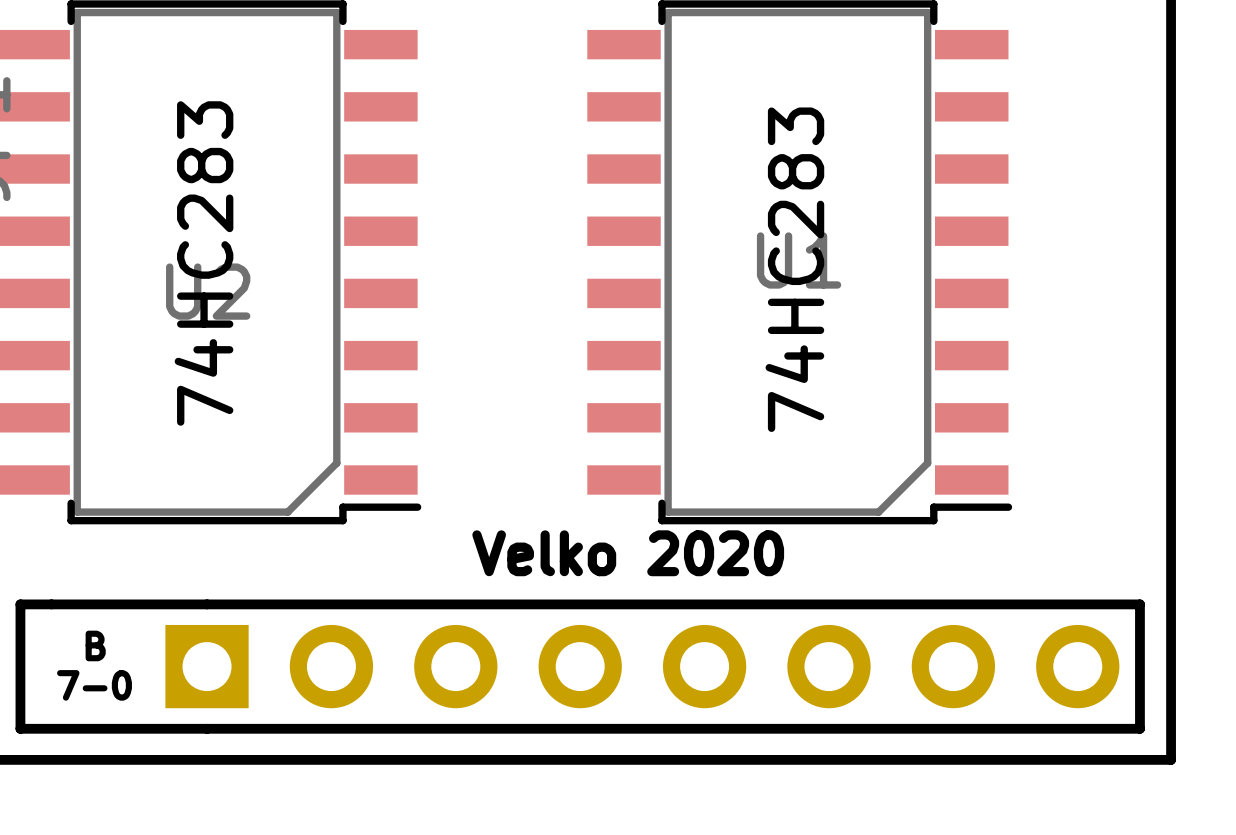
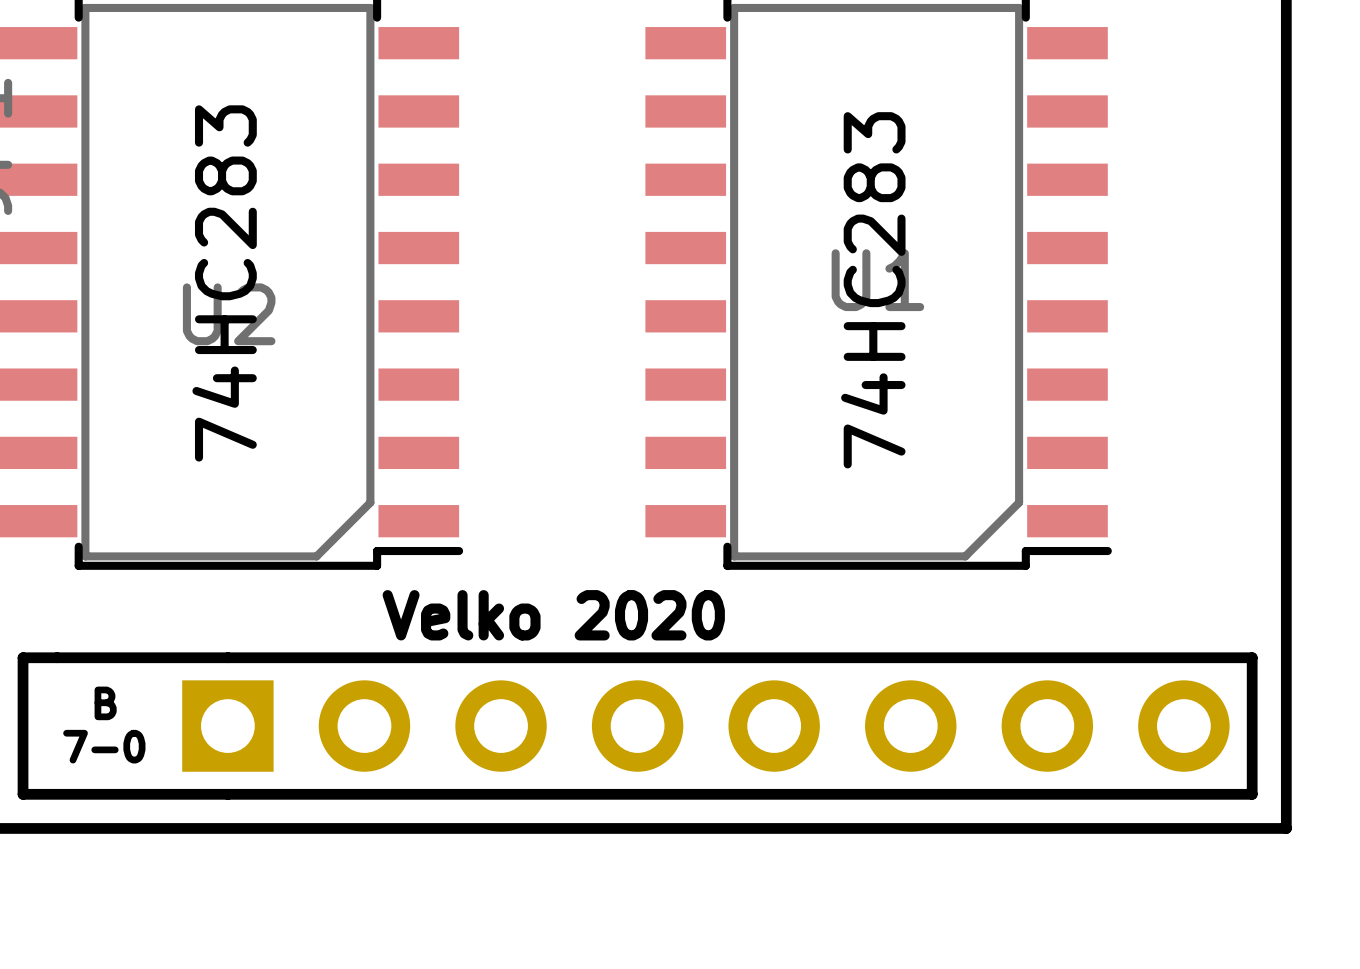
text position: Velko 2020 (628, 553) -> Velko 2020 (553, 615)

